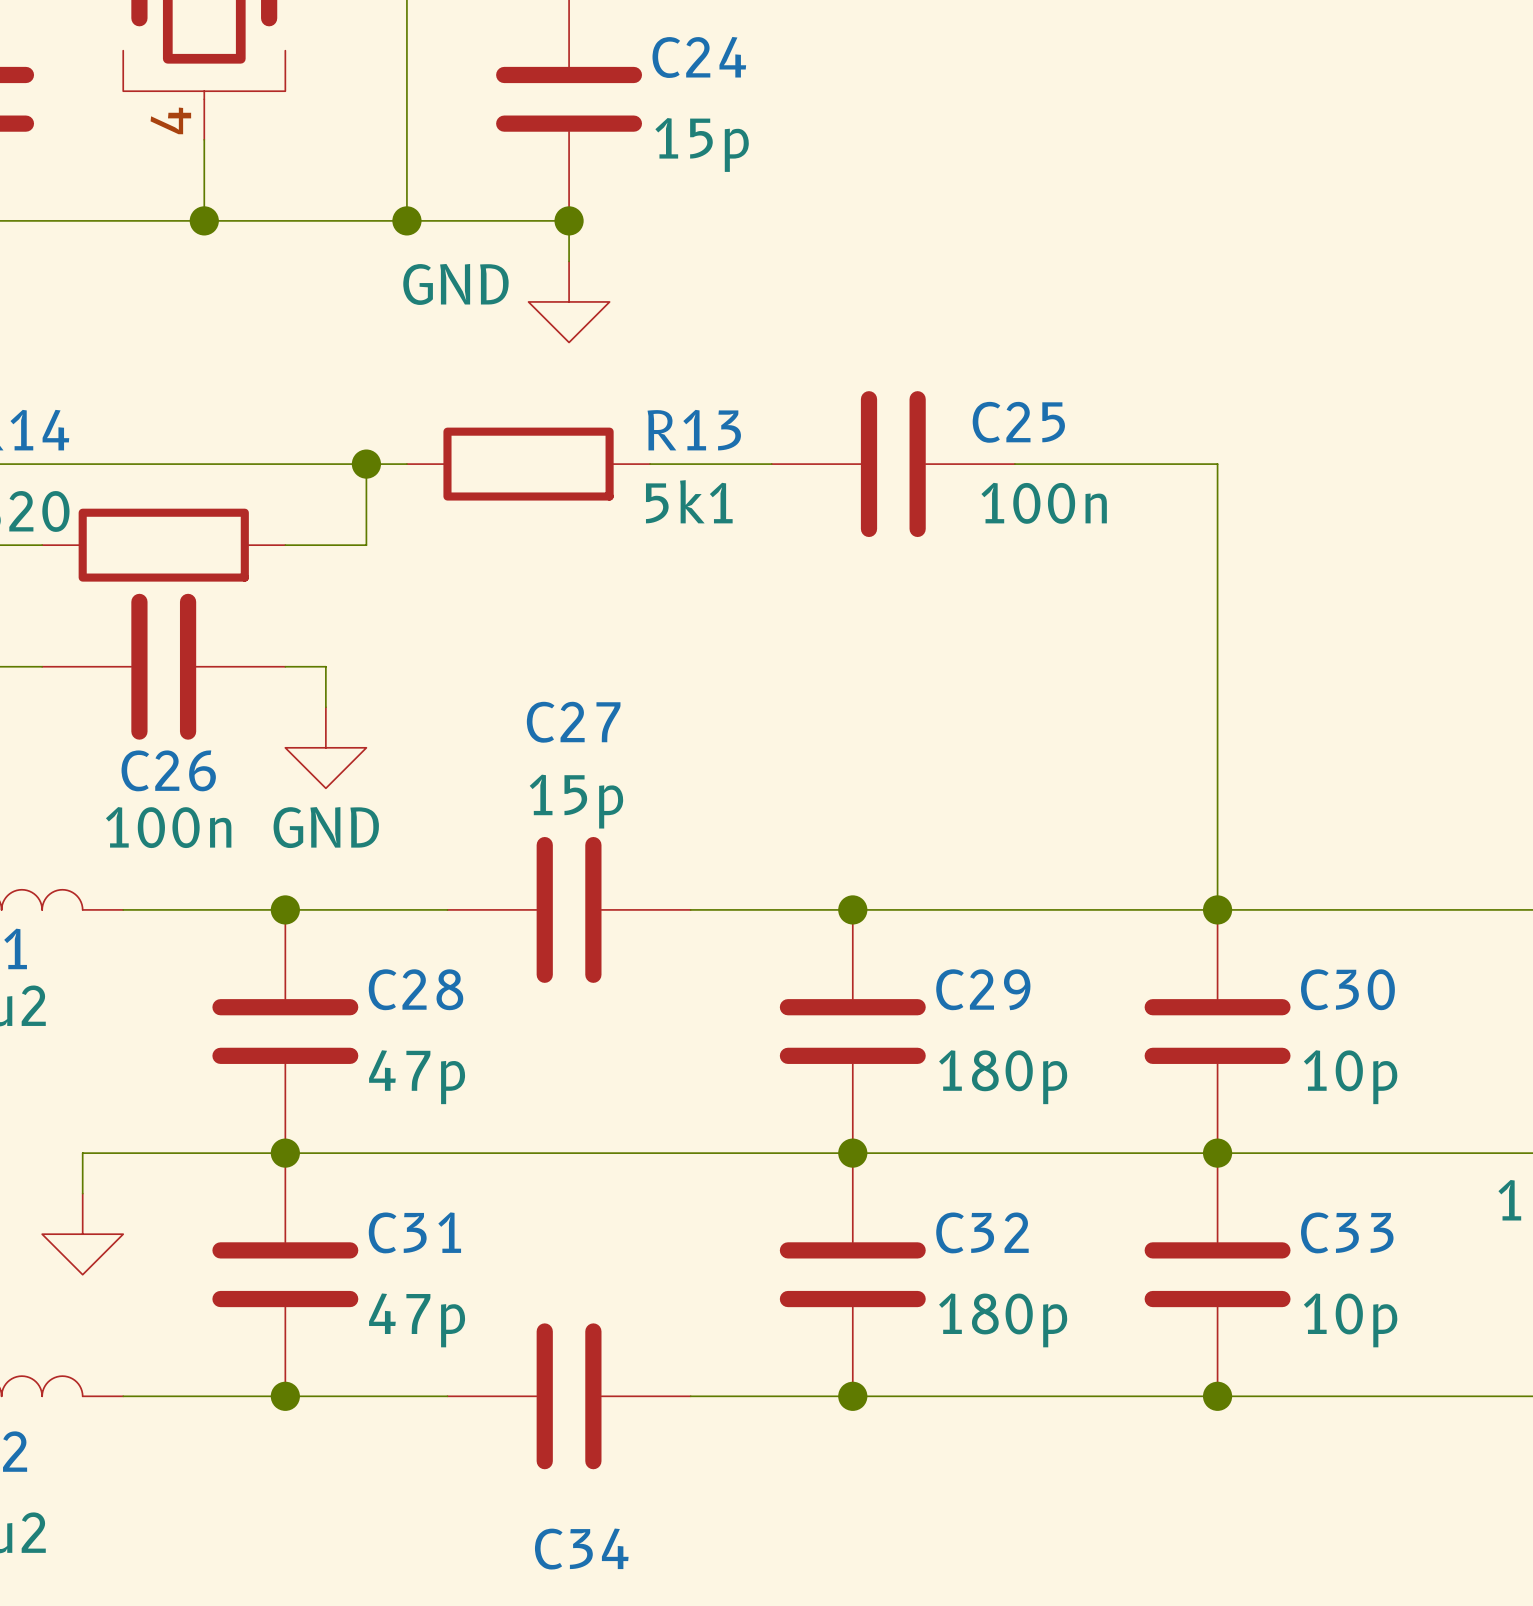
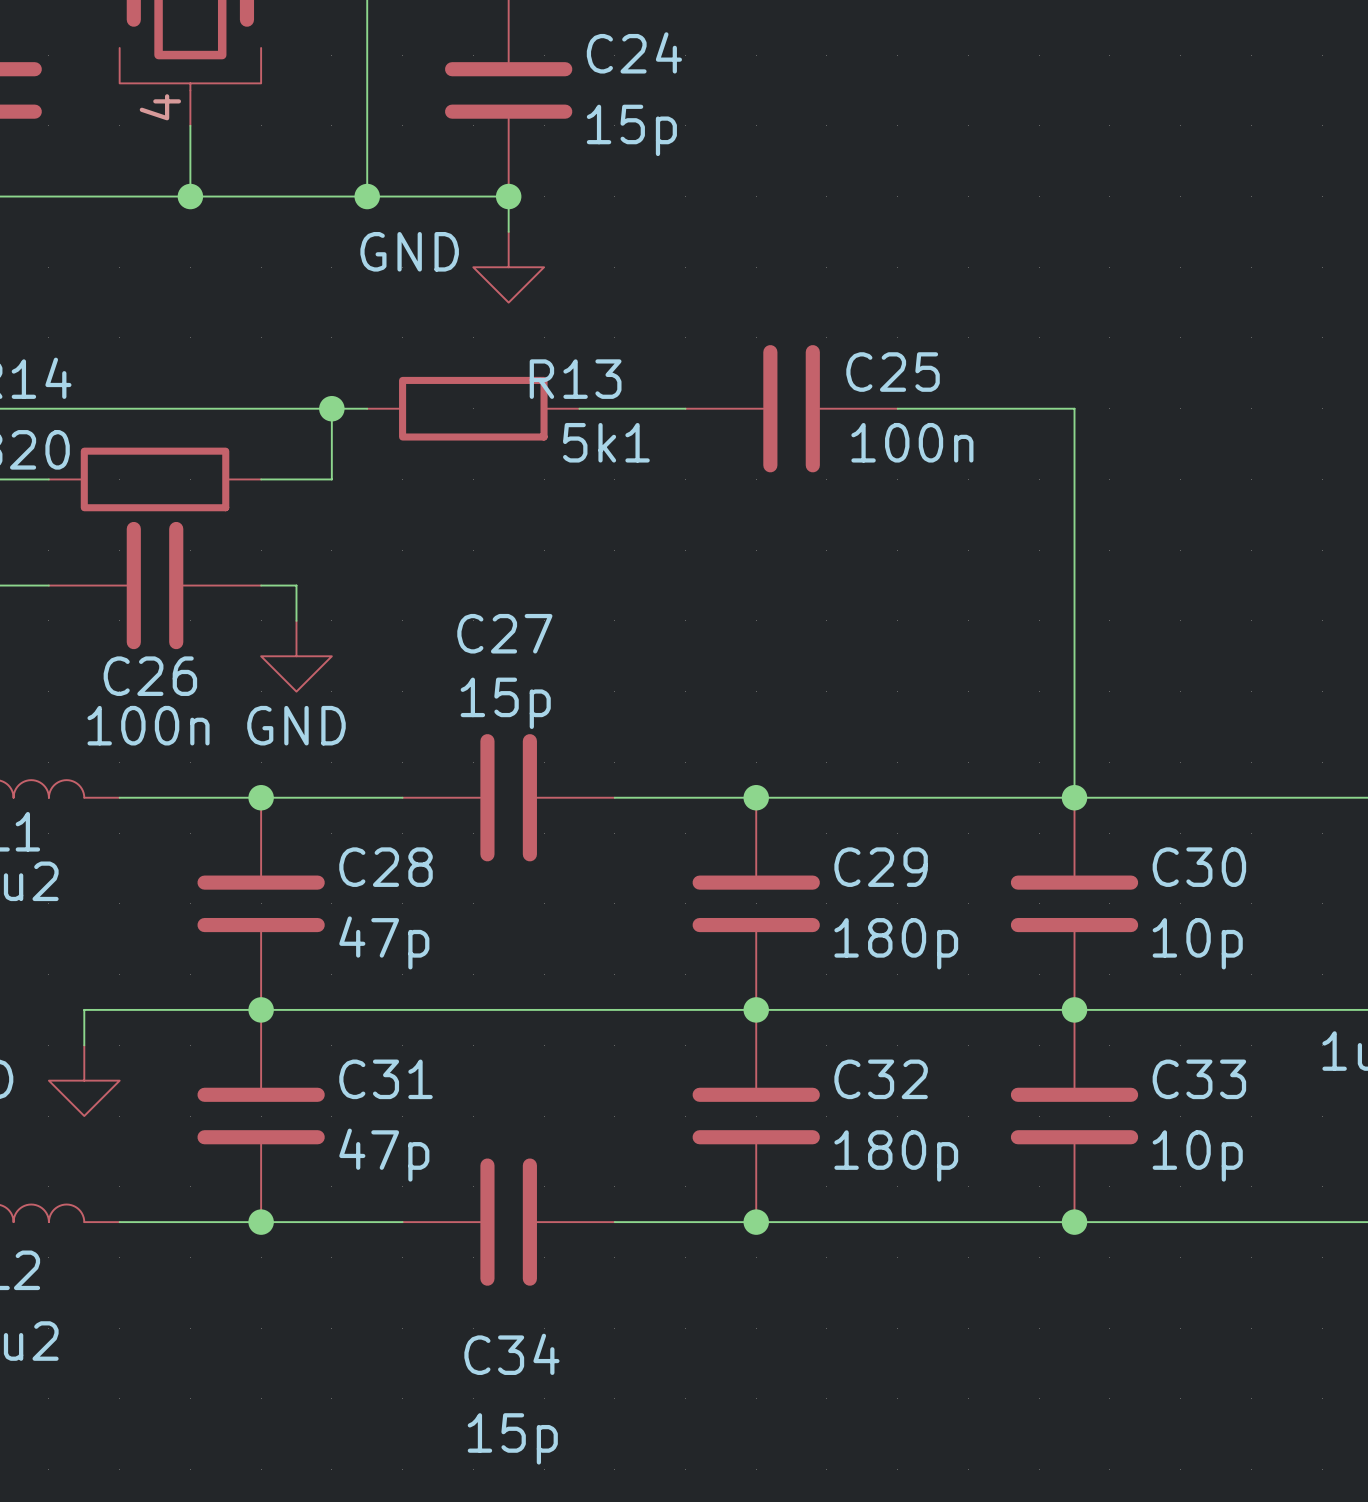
R13 name position: R13 (694, 430) -> R13 (575, 379)

